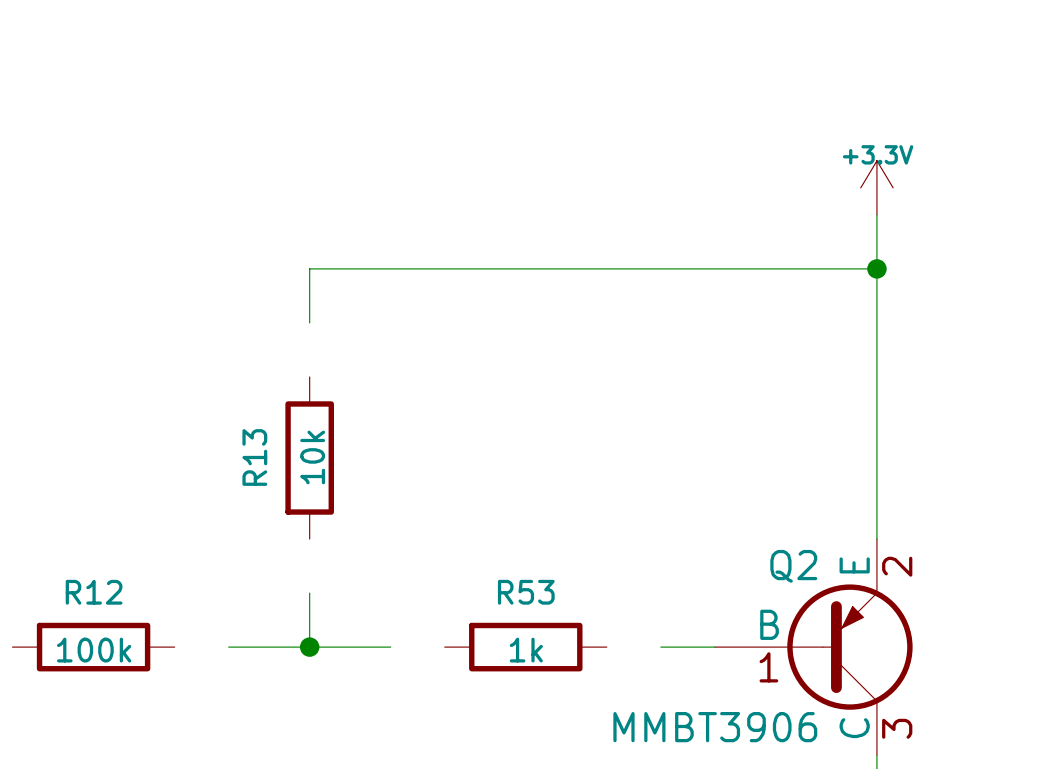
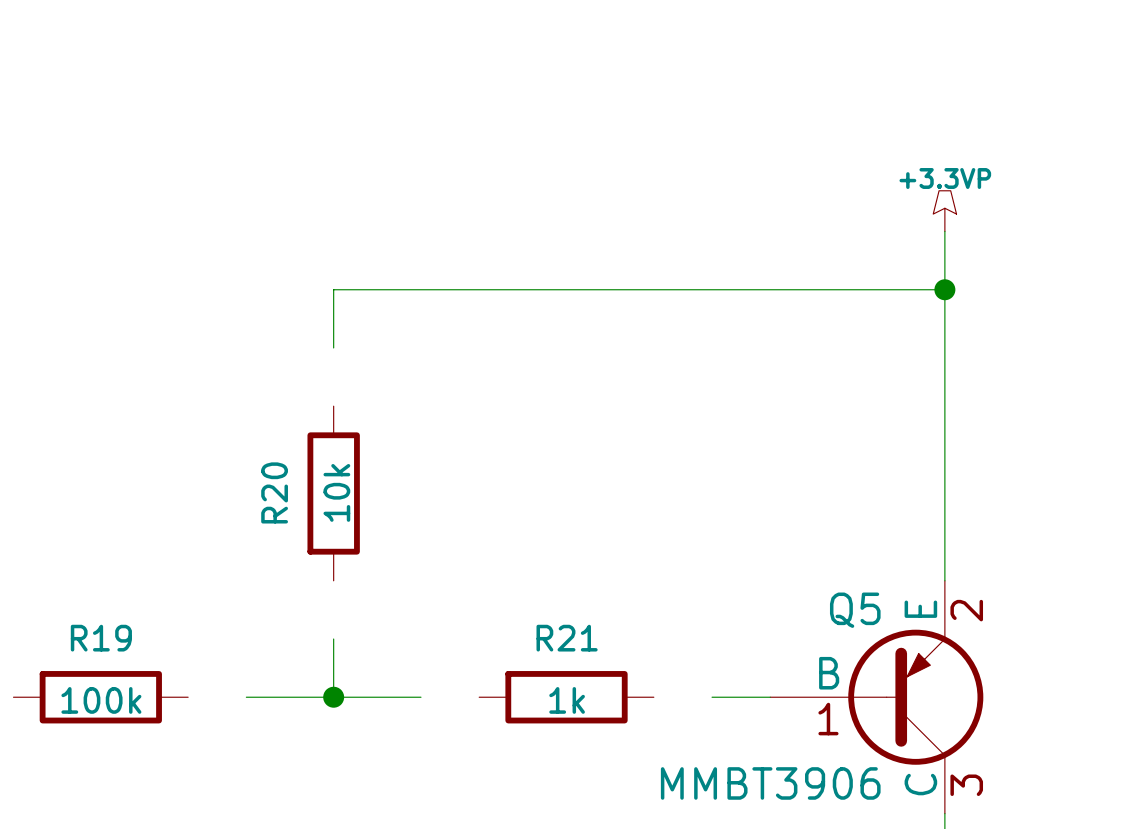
power symbol: +3.3V (876, 187) -> +3.3VP (944, 211)
R13 name: R13 (254, 457) -> R20 (274, 492)
Q2 name: Q2 (793, 566) -> Q5 (855, 610)
R12 name: R12 (94, 592) -> R19 (101, 638)
R53 name: R53 (526, 592) -> R21 (567, 638)

